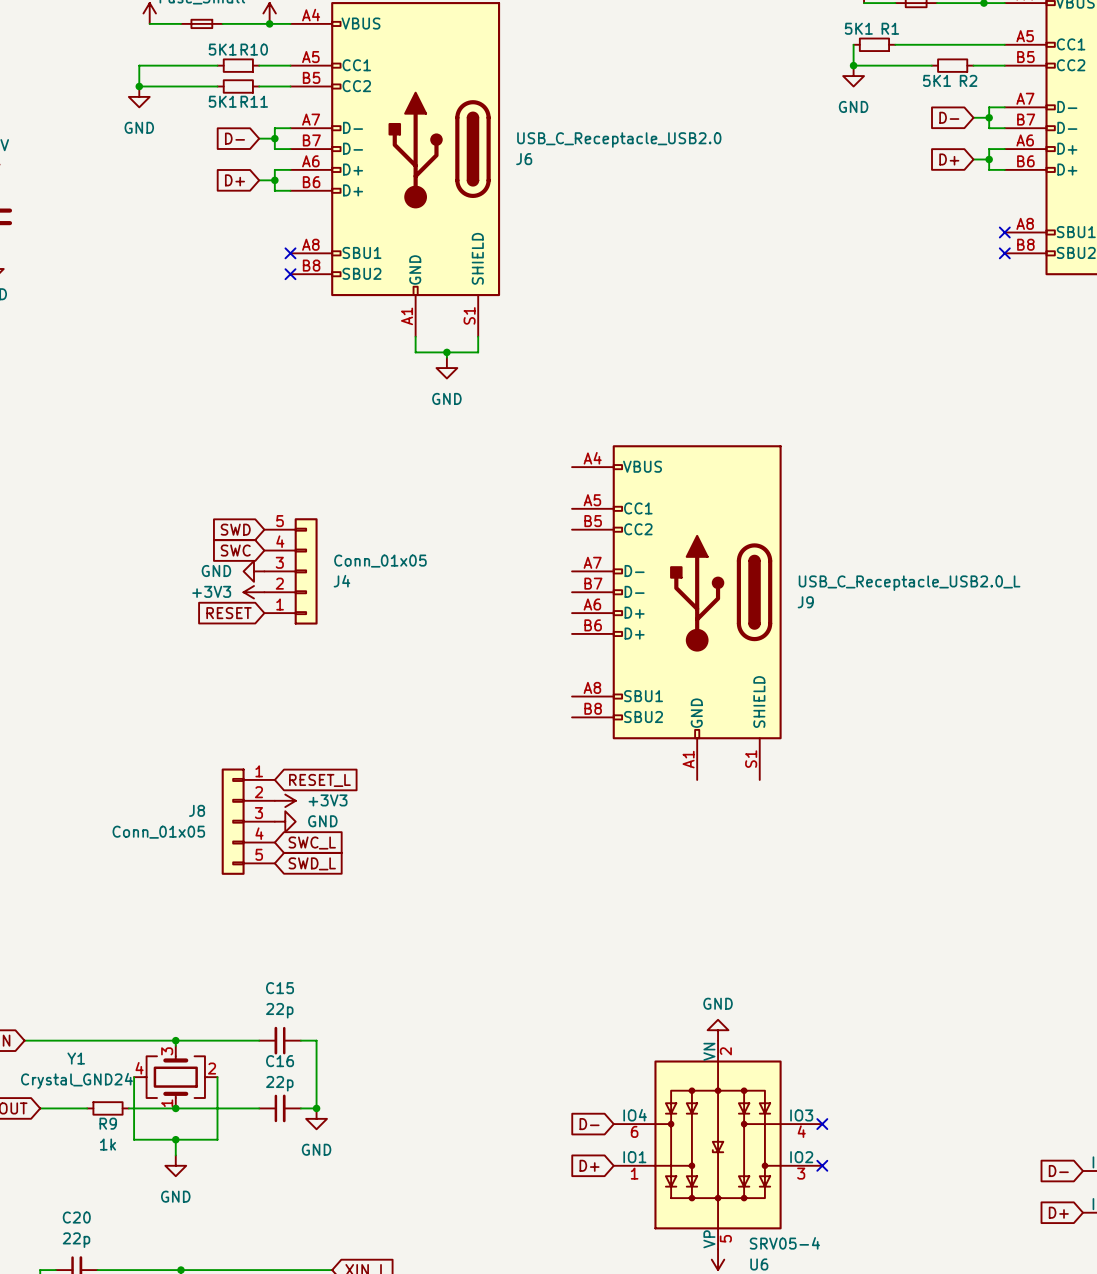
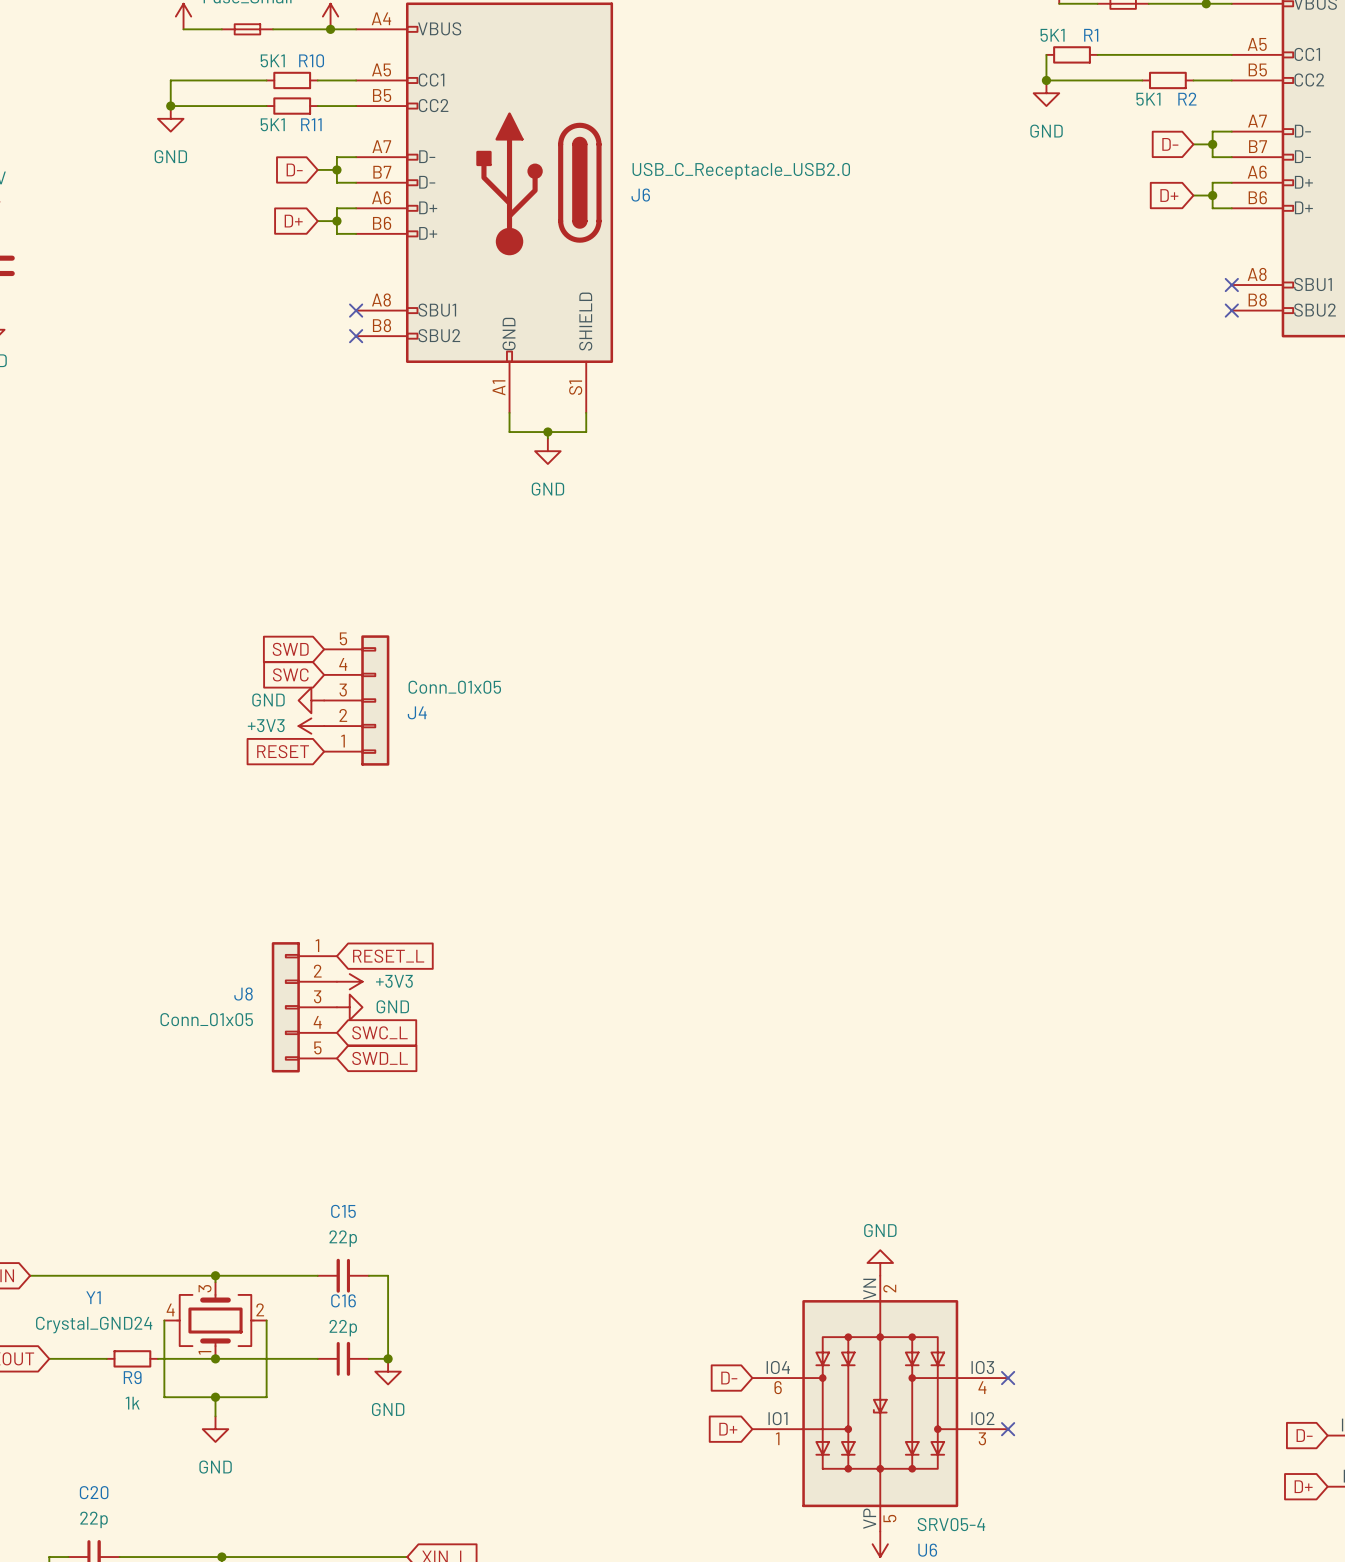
J9: USB_C_Receptacle_USB2.0_L (676, 612) -> none

